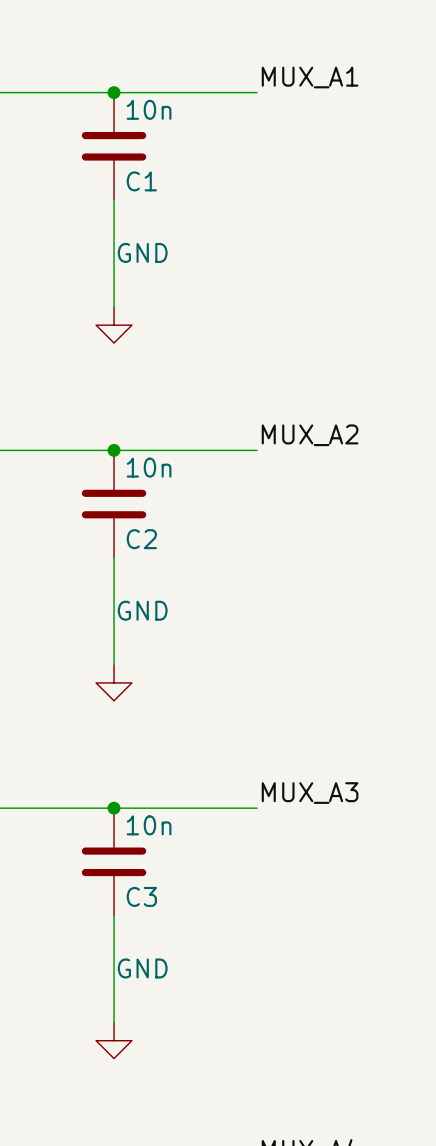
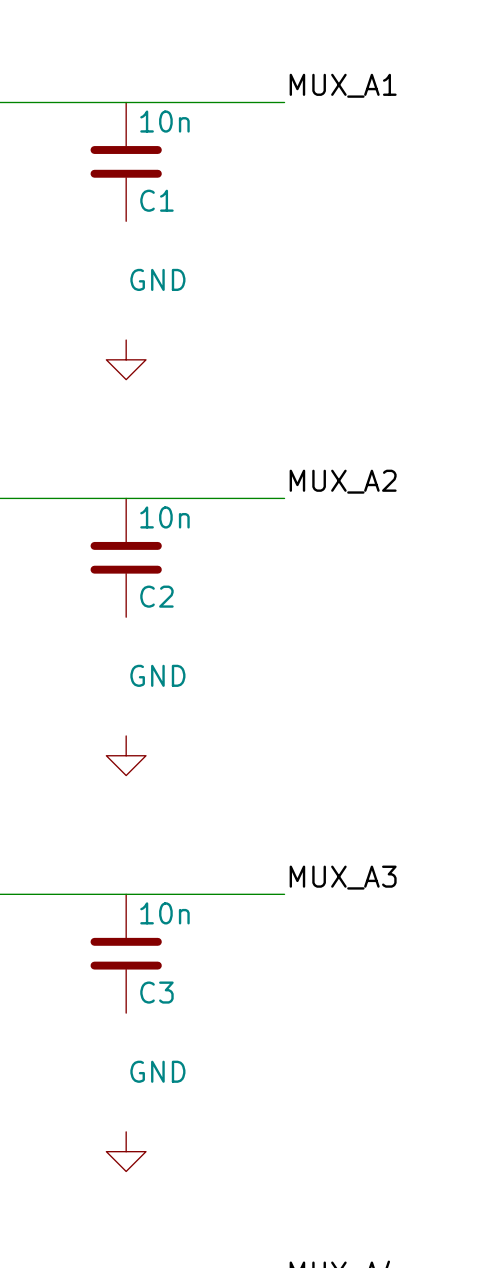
junction: (114, 92) -> none
wire: (114, 199) (114, 307) -> none
junction: (114, 450) -> none
wire: (114, 557) (114, 665) -> none
junction: (114, 808) -> none
wire: (114, 915) (114, 1022) -> none

